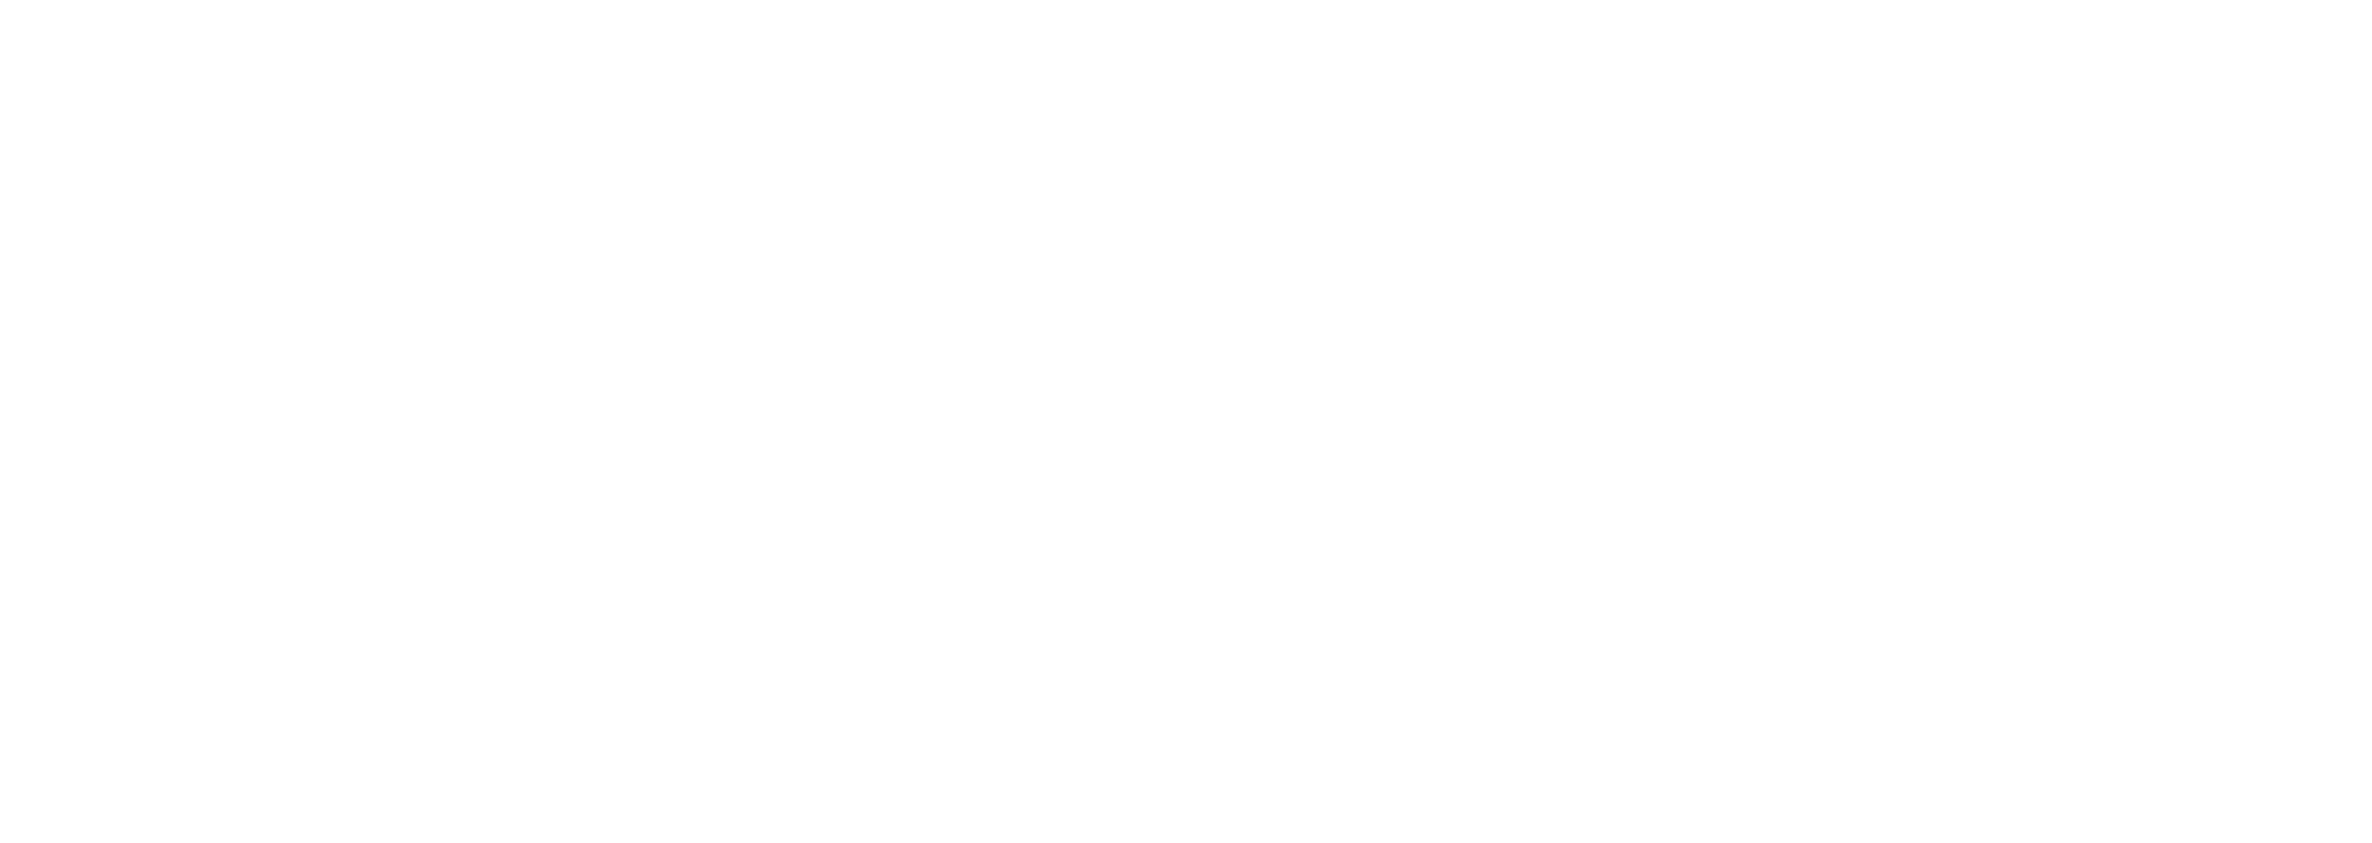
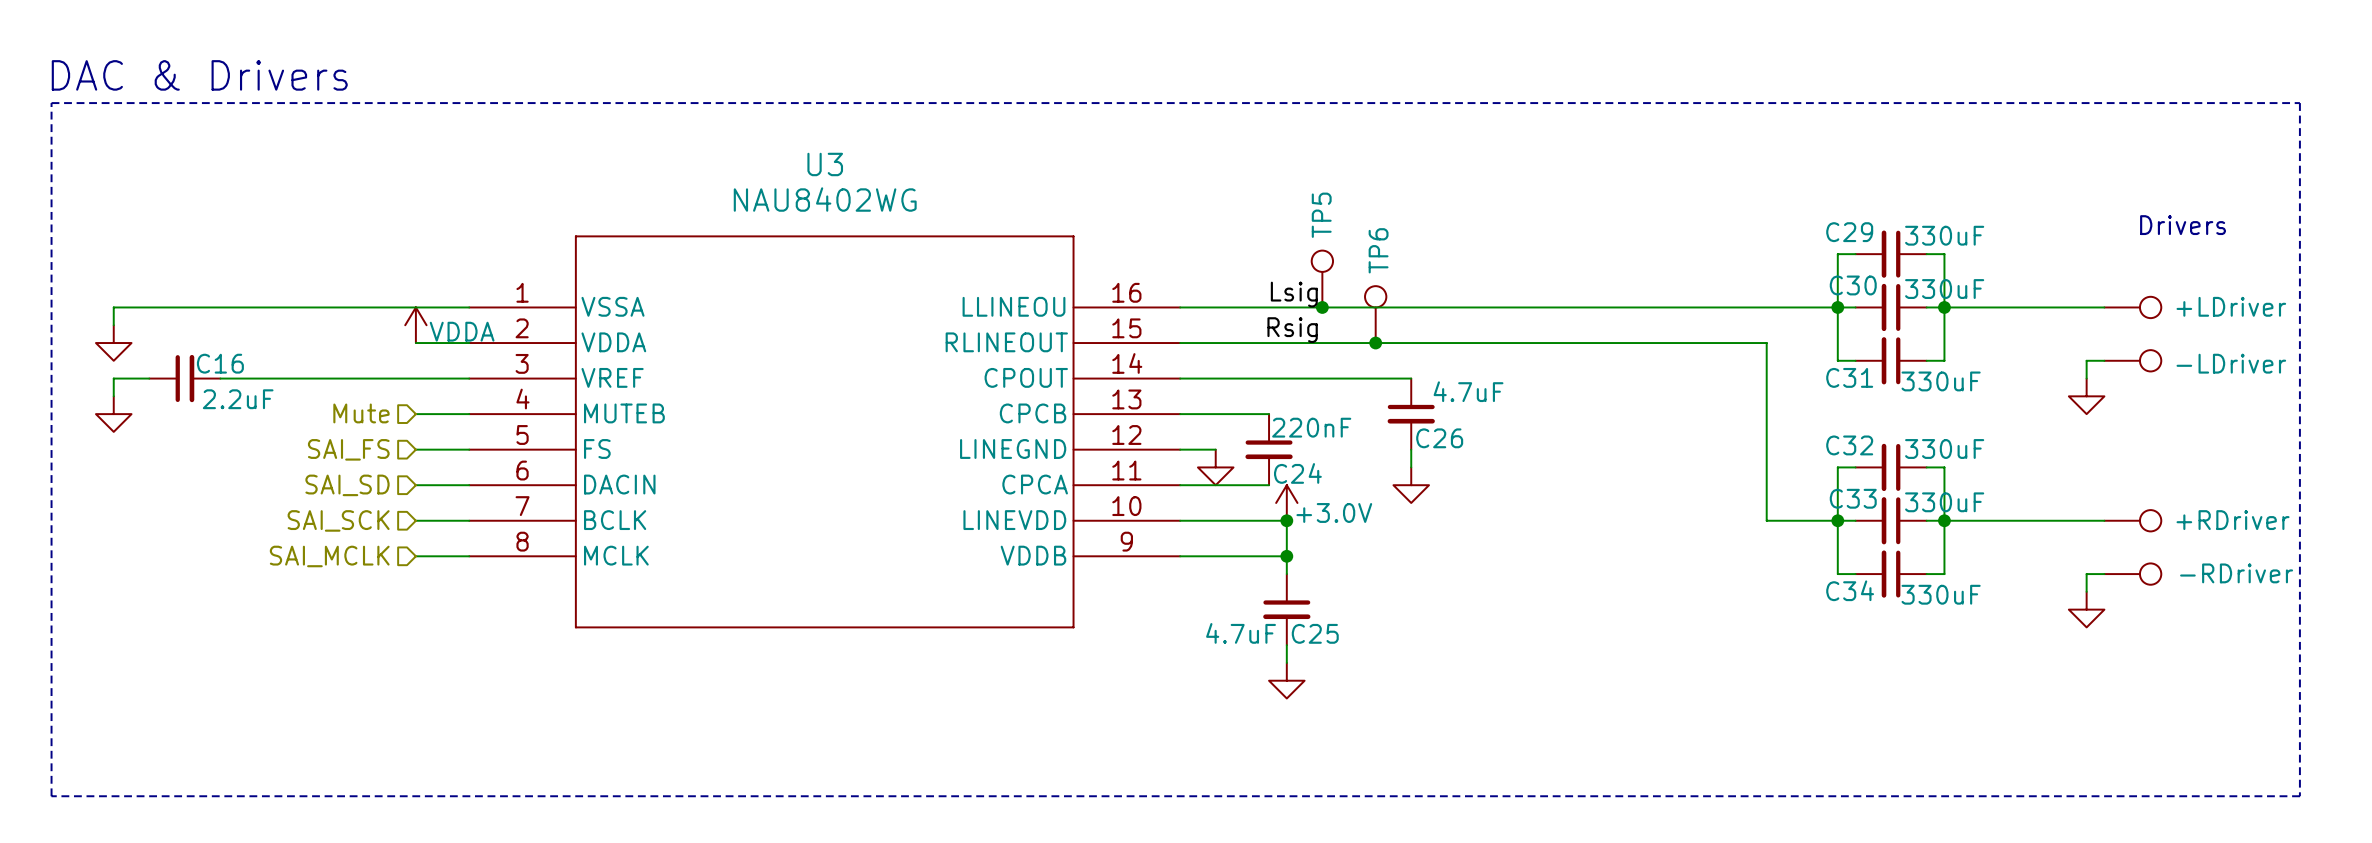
text: none -> DAC & Drivers (199, 75)
line: none -> (51, 103) (2299, 103) (2299, 796) (51, 796) (51, 103)
text: none -> Drivers (2183, 225)
wire: none -> (1855, 254) (1837, 254) (1837, 360) (1855, 360)
C29: none -> 330uF (1891, 254)
wire: none -> (1926, 254) (1944, 254) (1944, 360) (1926, 360)
TP5: none -> (1322, 279)
label: none -> Lsig (1294, 294)
wire: none -> (469, 307) (113, 307) (113, 325)
wire: none -> (1180, 307) (1855, 307)
junction: none -> (1322, 307)
junction: none -> (1837, 307)
C30: none -> 330uF (1891, 307)
wire: none -> (1926, 307) (2104, 307)
junction: none -> (1944, 307)
part: none -> +LDriver (2132, 307)
TP6: none -> (1375, 314)
power symbol: none -> VDDA (415, 325)
label: none -> Rsig (1292, 330)
power symbol: none -> (113, 343)
wire: none -> (415, 343) (469, 343)
wire: none -> (1180, 343) (1766, 343) (1766, 520) (1855, 520)
junction: none -> (1375, 343)
C31: none -> 330uF (1891, 360)
wire: none -> (2104, 360) (2086, 360) (2086, 378)
part: none -> -LDriver (2132, 360)
wire: none -> (149, 378) (113, 378) (113, 396)
C16: none -> 2.2uF (184, 378)
wire: none -> (220, 378) (469, 378)
wire: none -> (1180, 378) (1411, 378)
power symbol: none -> (2086, 396)
hierarchical label: none -> Mute (361, 413)
power symbol: none -> (113, 414)
wire: none -> (415, 414) (469, 414)
wire: none -> (1180, 414) (1269, 414)
C26: none -> 4.7uF (1411, 414)
U3: none -> NAU8402WG (824, 431)
hierarchical label: none -> SAI_FS (348, 449)
wire: none -> (415, 449) (469, 449)
wire: none -> (1180, 449) (1215, 449)
C24: none -> 220nF (1269, 449)
wire: none -> (1411, 449) (1411, 467)
power symbol: none -> (1215, 467)
wire: none -> (1855, 467) (1837, 467) (1837, 574) (1855, 574)
C32: none -> 330uF (1891, 467)
wire: none -> (1926, 467) (1944, 467) (1944, 574) (1926, 574)
hierarchical label: none -> SAI_SD (347, 485)
wire: none -> (415, 485) (469, 485)
wire: none -> (1180, 485) (1269, 485)
power symbol: none -> (1411, 485)
power symbol: none -> +3.0V (1286, 502)
hierarchical label: none -> SAI_SCK (338, 520)
wire: none -> (415, 520) (469, 520)
wire: none -> (1180, 520) (1286, 520) (1286, 574)
junction: none -> (1286, 520)
junction: none -> (1837, 520)
C33: none -> 330uF (1891, 520)
wire: none -> (1926, 520) (2104, 520)
junction: none -> (1944, 520)
part: none -> +RDriver (2132, 520)
hierarchical label: none -> SAI_MCLK (329, 556)
wire: none -> (415, 556) (469, 556)
wire: none -> (1180, 556) (1286, 556)
junction: none -> (1286, 556)
C34: none -> 330uF (1891, 574)
wire: none -> (2104, 574) (2086, 574) (2086, 591)
part: none -> -RDriver (2132, 574)
C25: none -> 4.7uF (1286, 609)
power symbol: none -> (2086, 609)
wire: none -> (1286, 645) (1286, 662)
power symbol: none -> (1286, 680)

